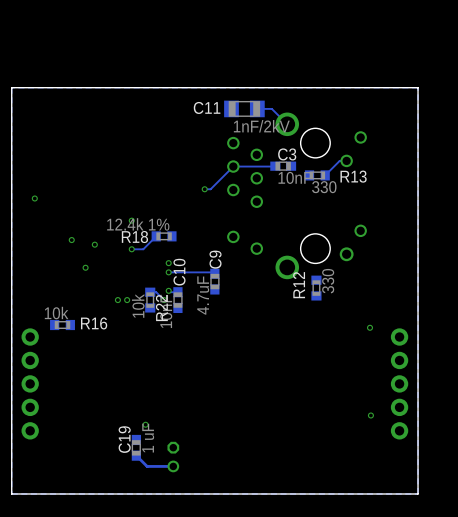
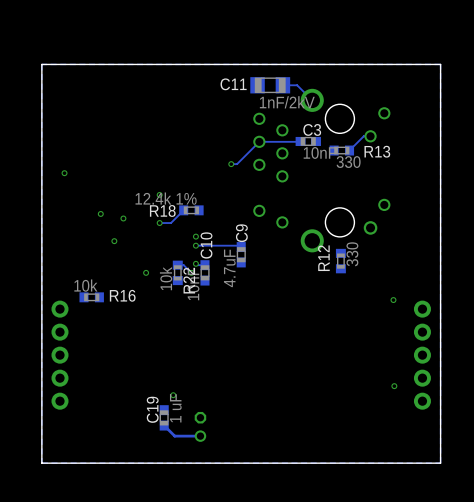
via: (127, 300) -> none

